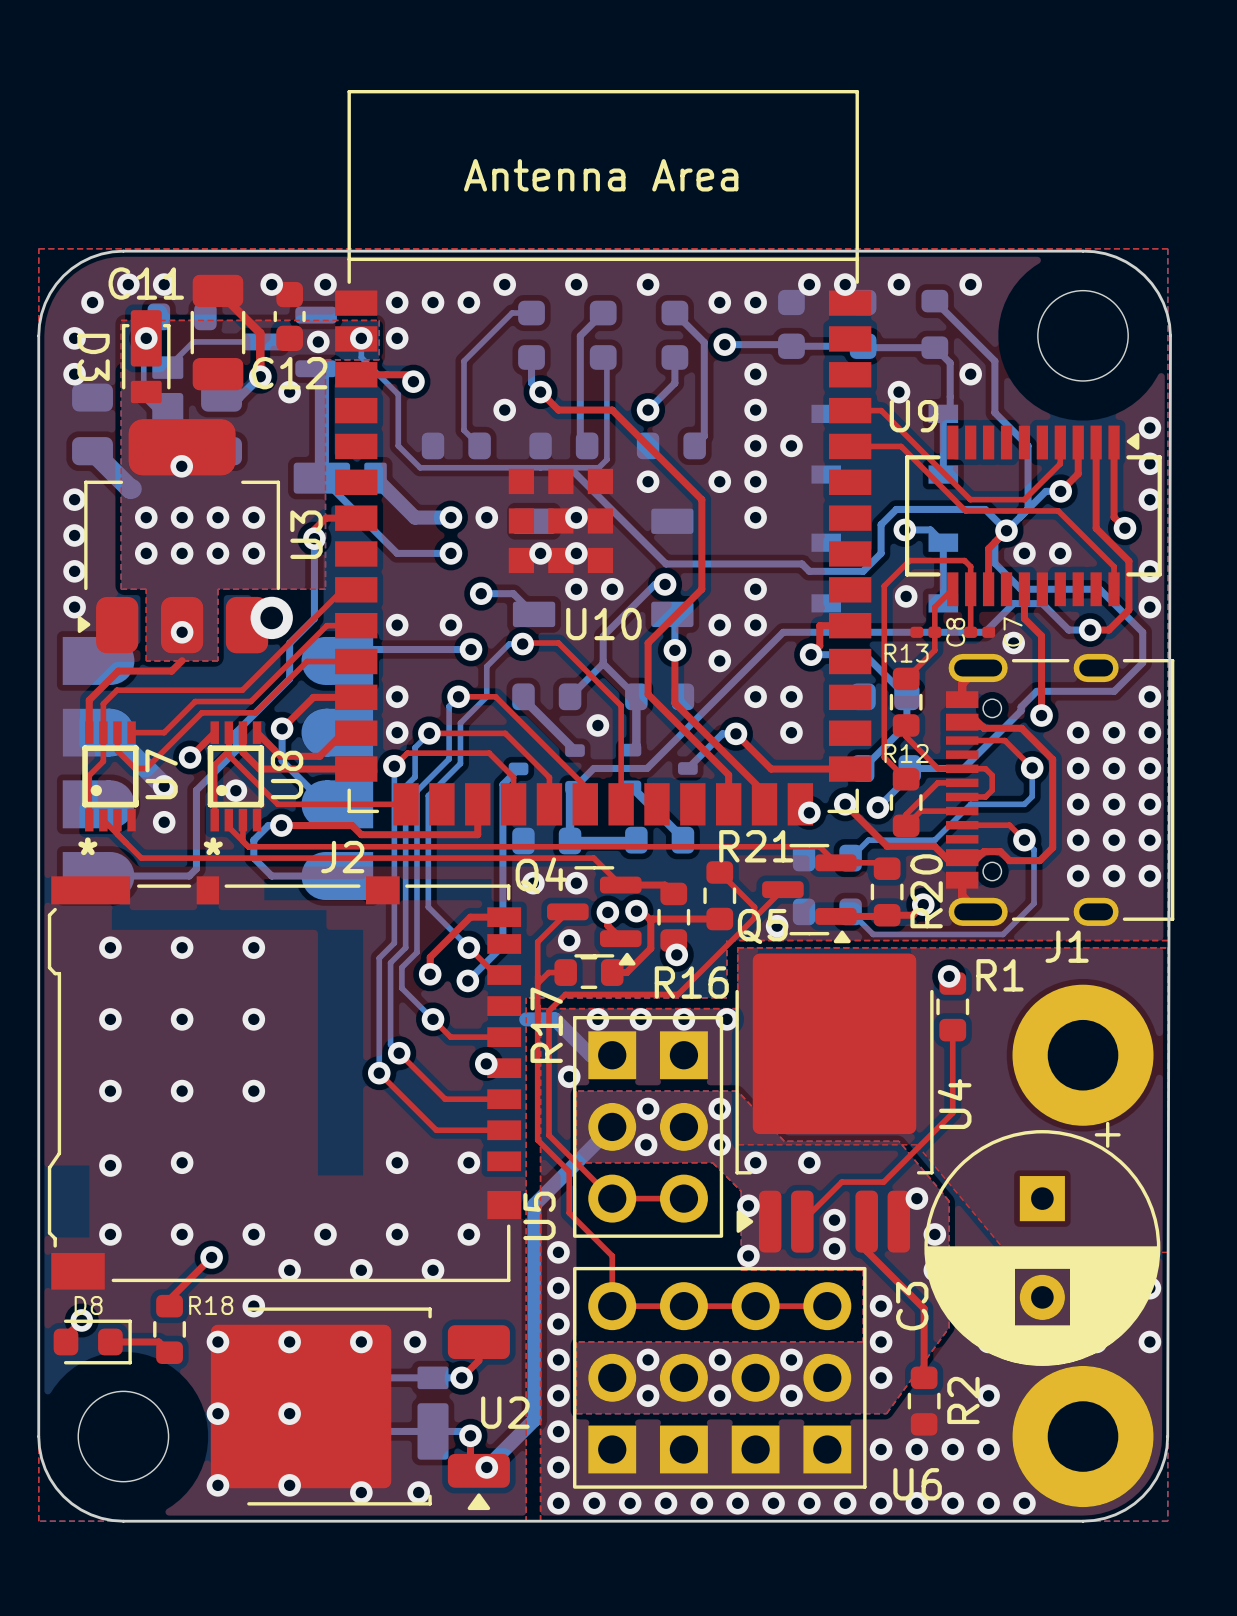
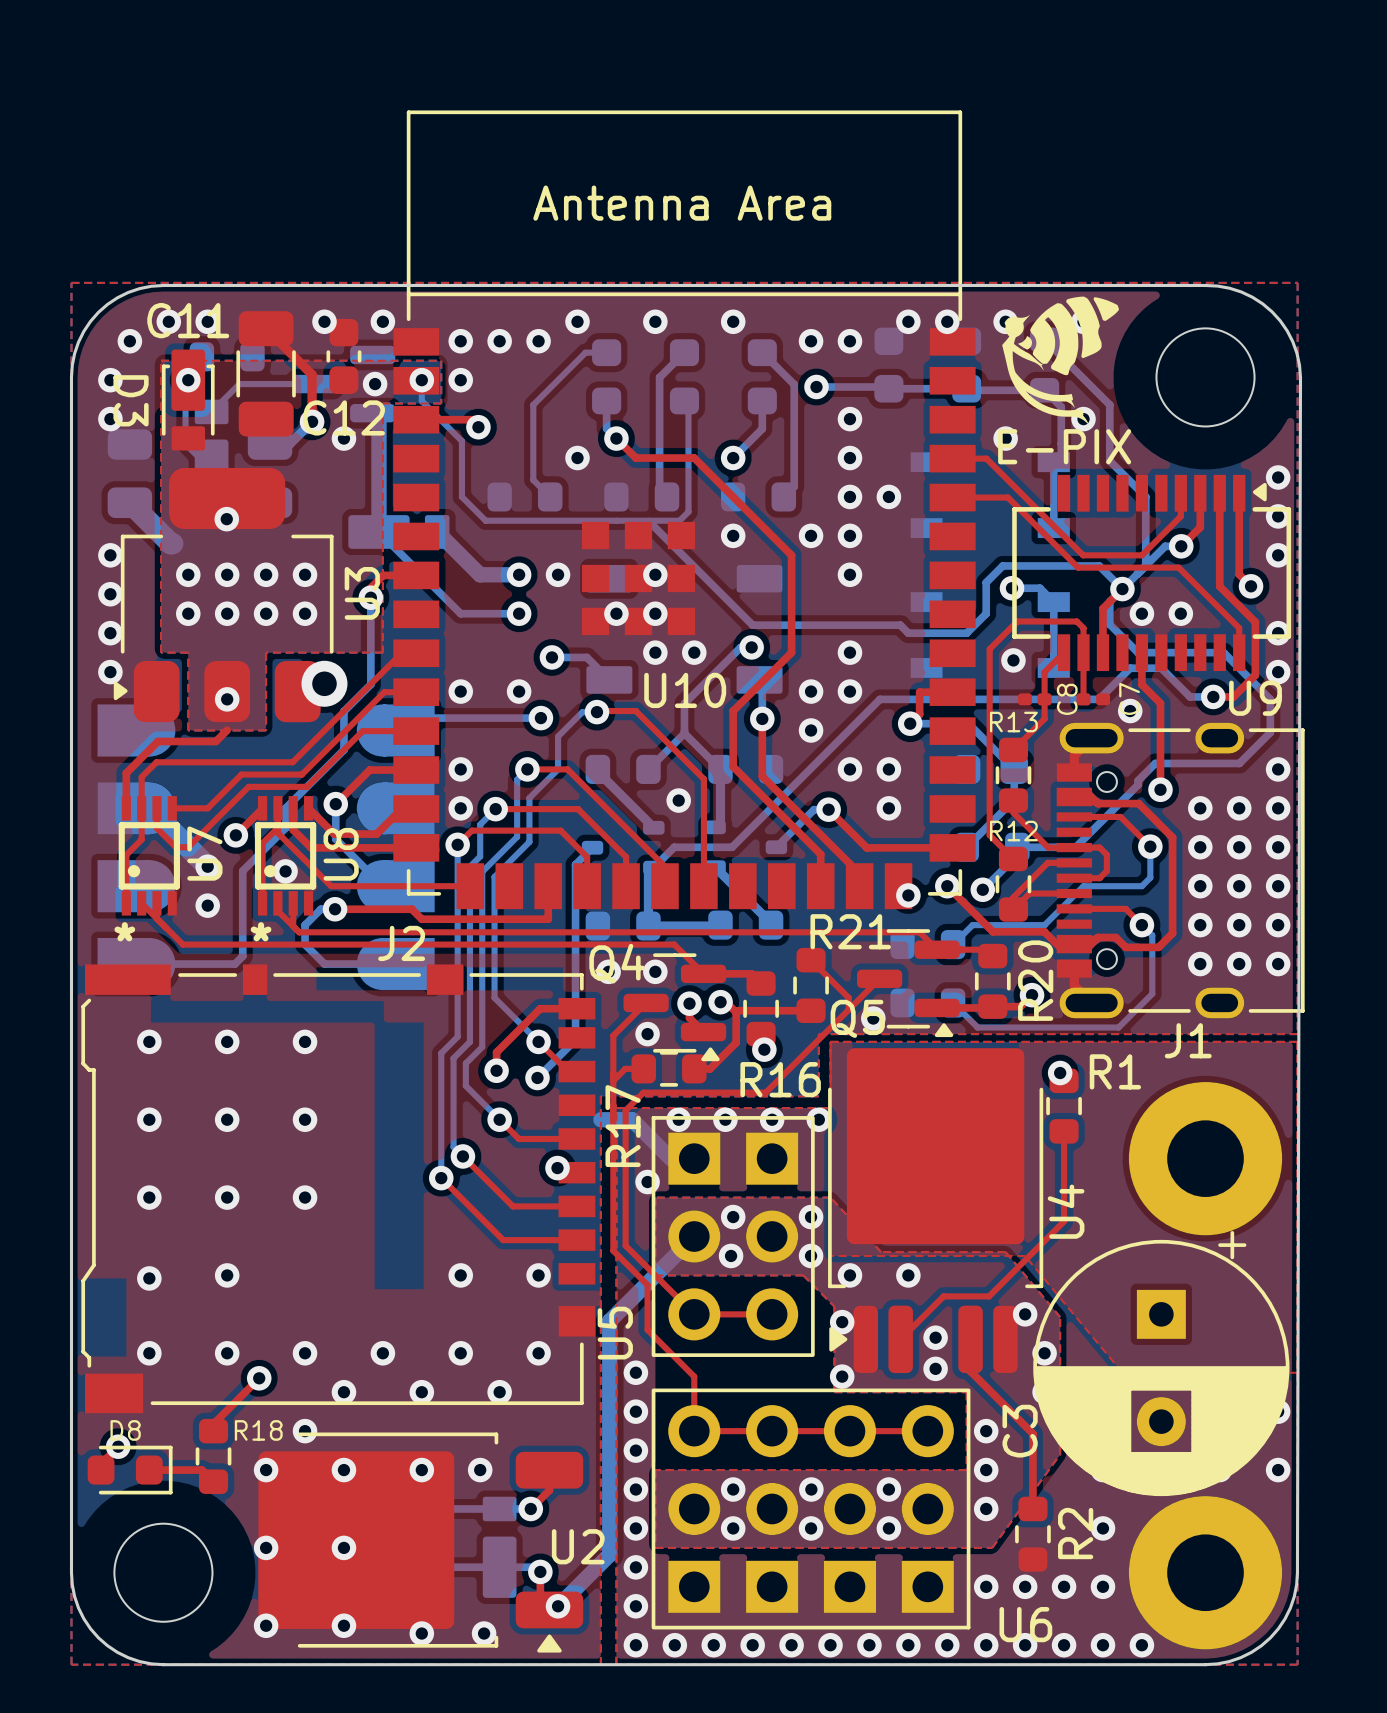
drawing: none -> [1002, 296, 1119, 425]
text: none -> E-PIX (1064, 446)
U9 name position: U9 (914, 416) -> U9 (1255, 698)

